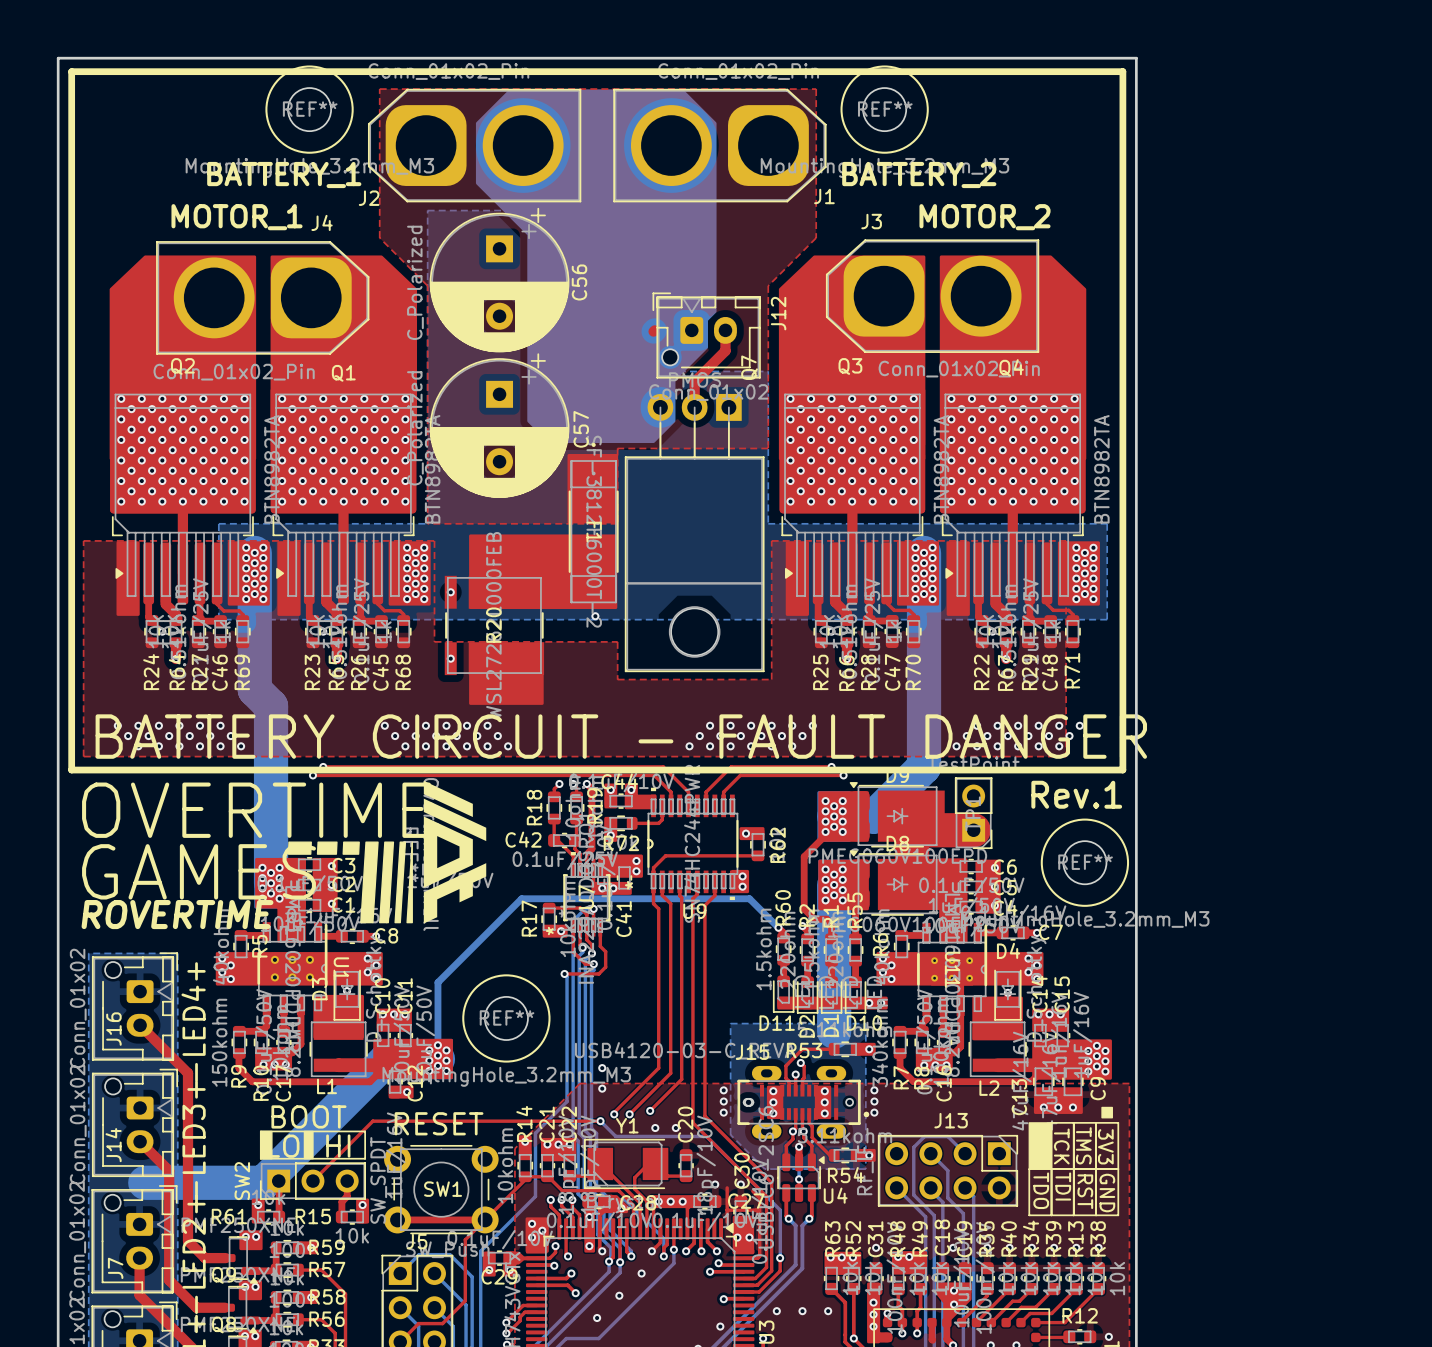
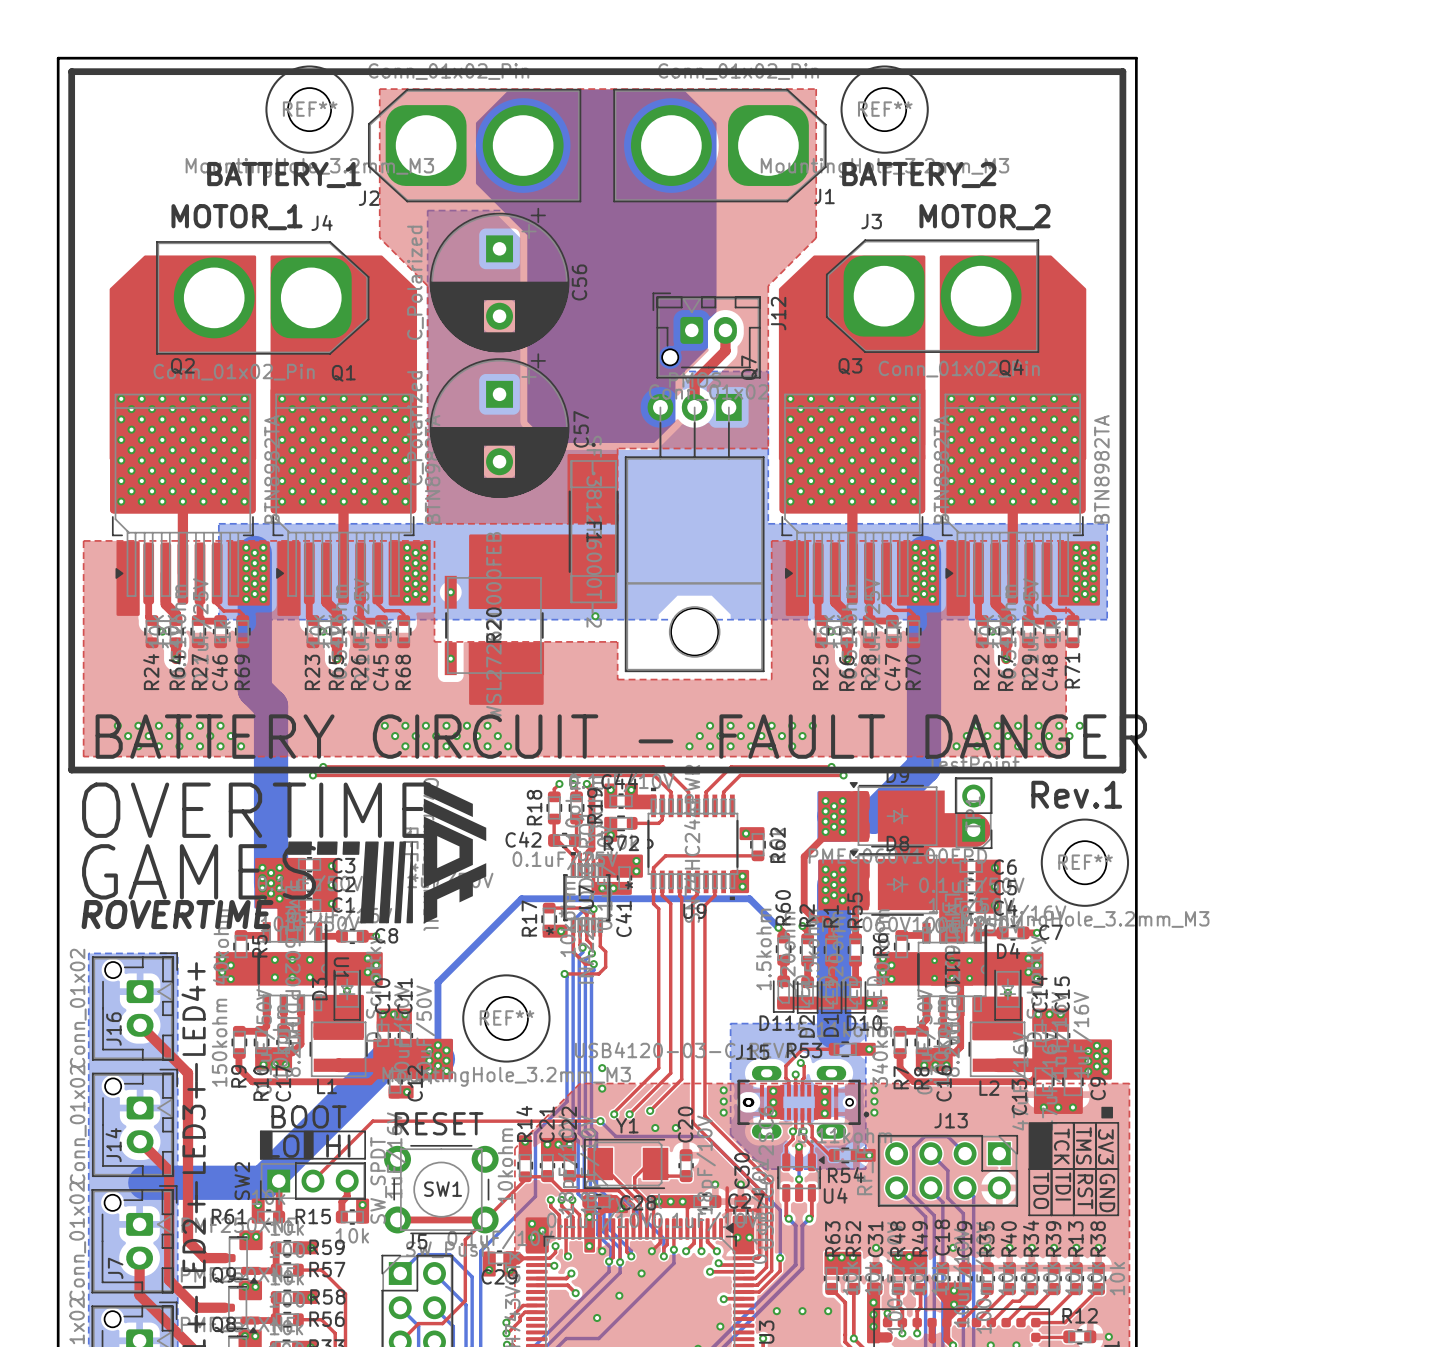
top track: (654, 330) (653, 331) -> none

